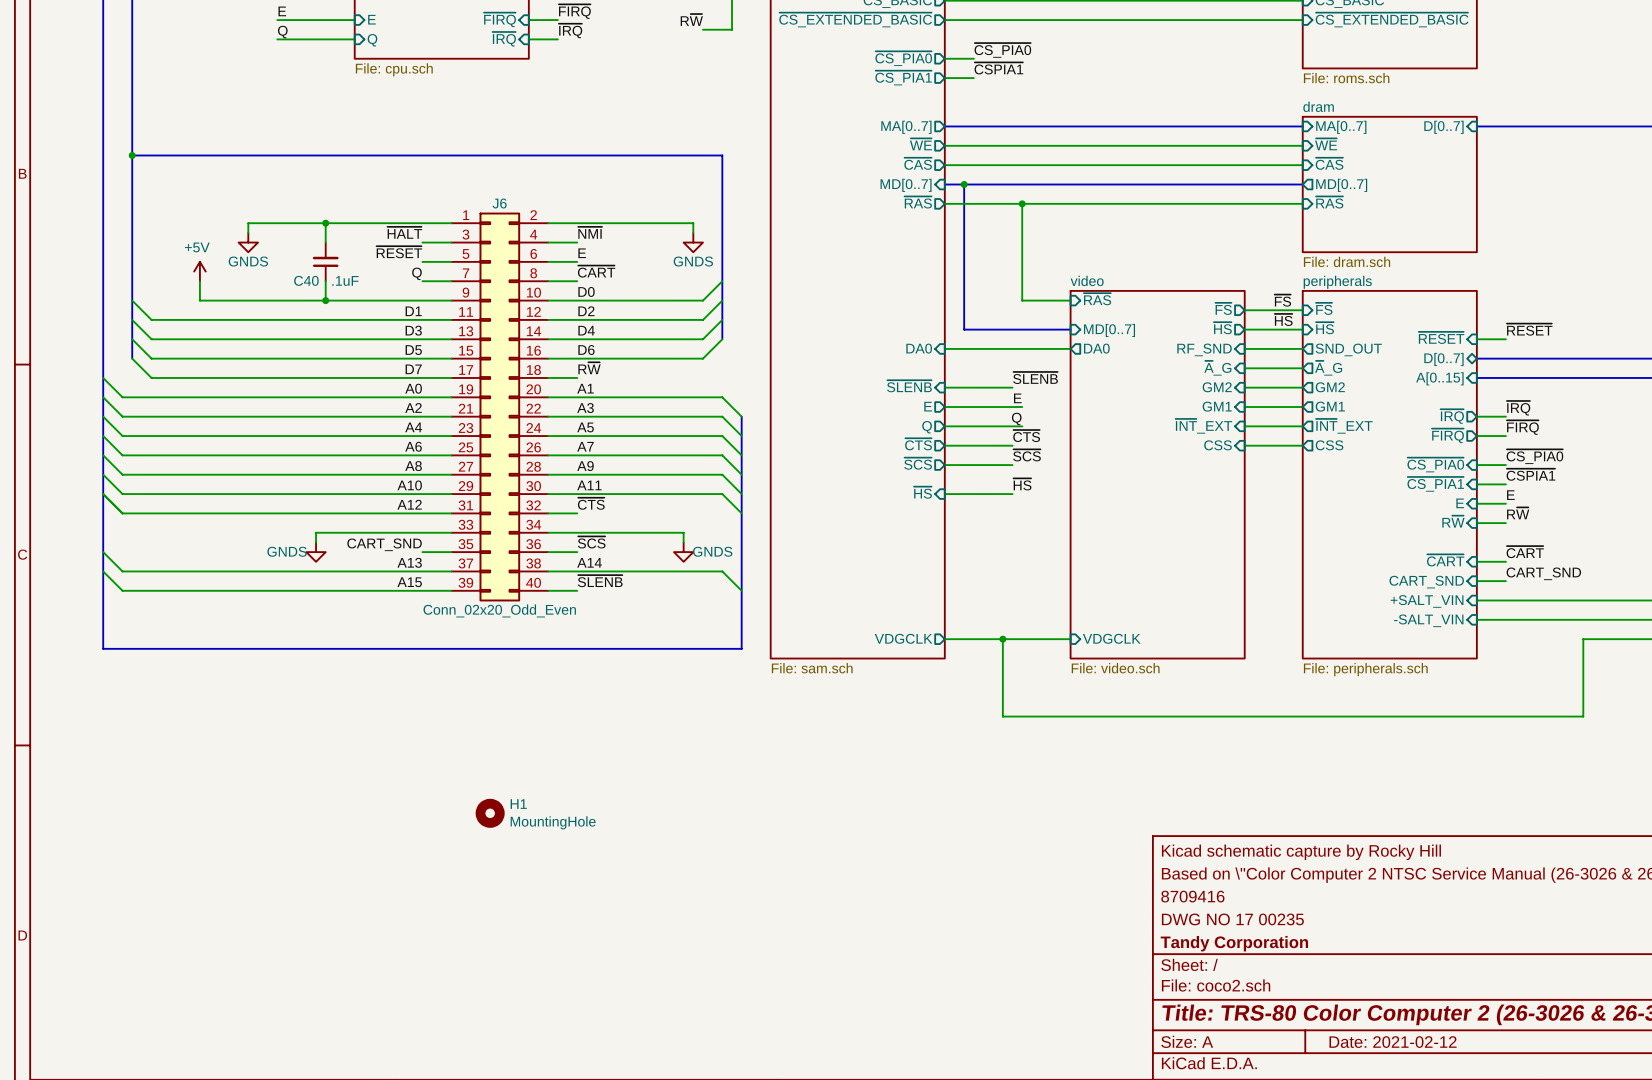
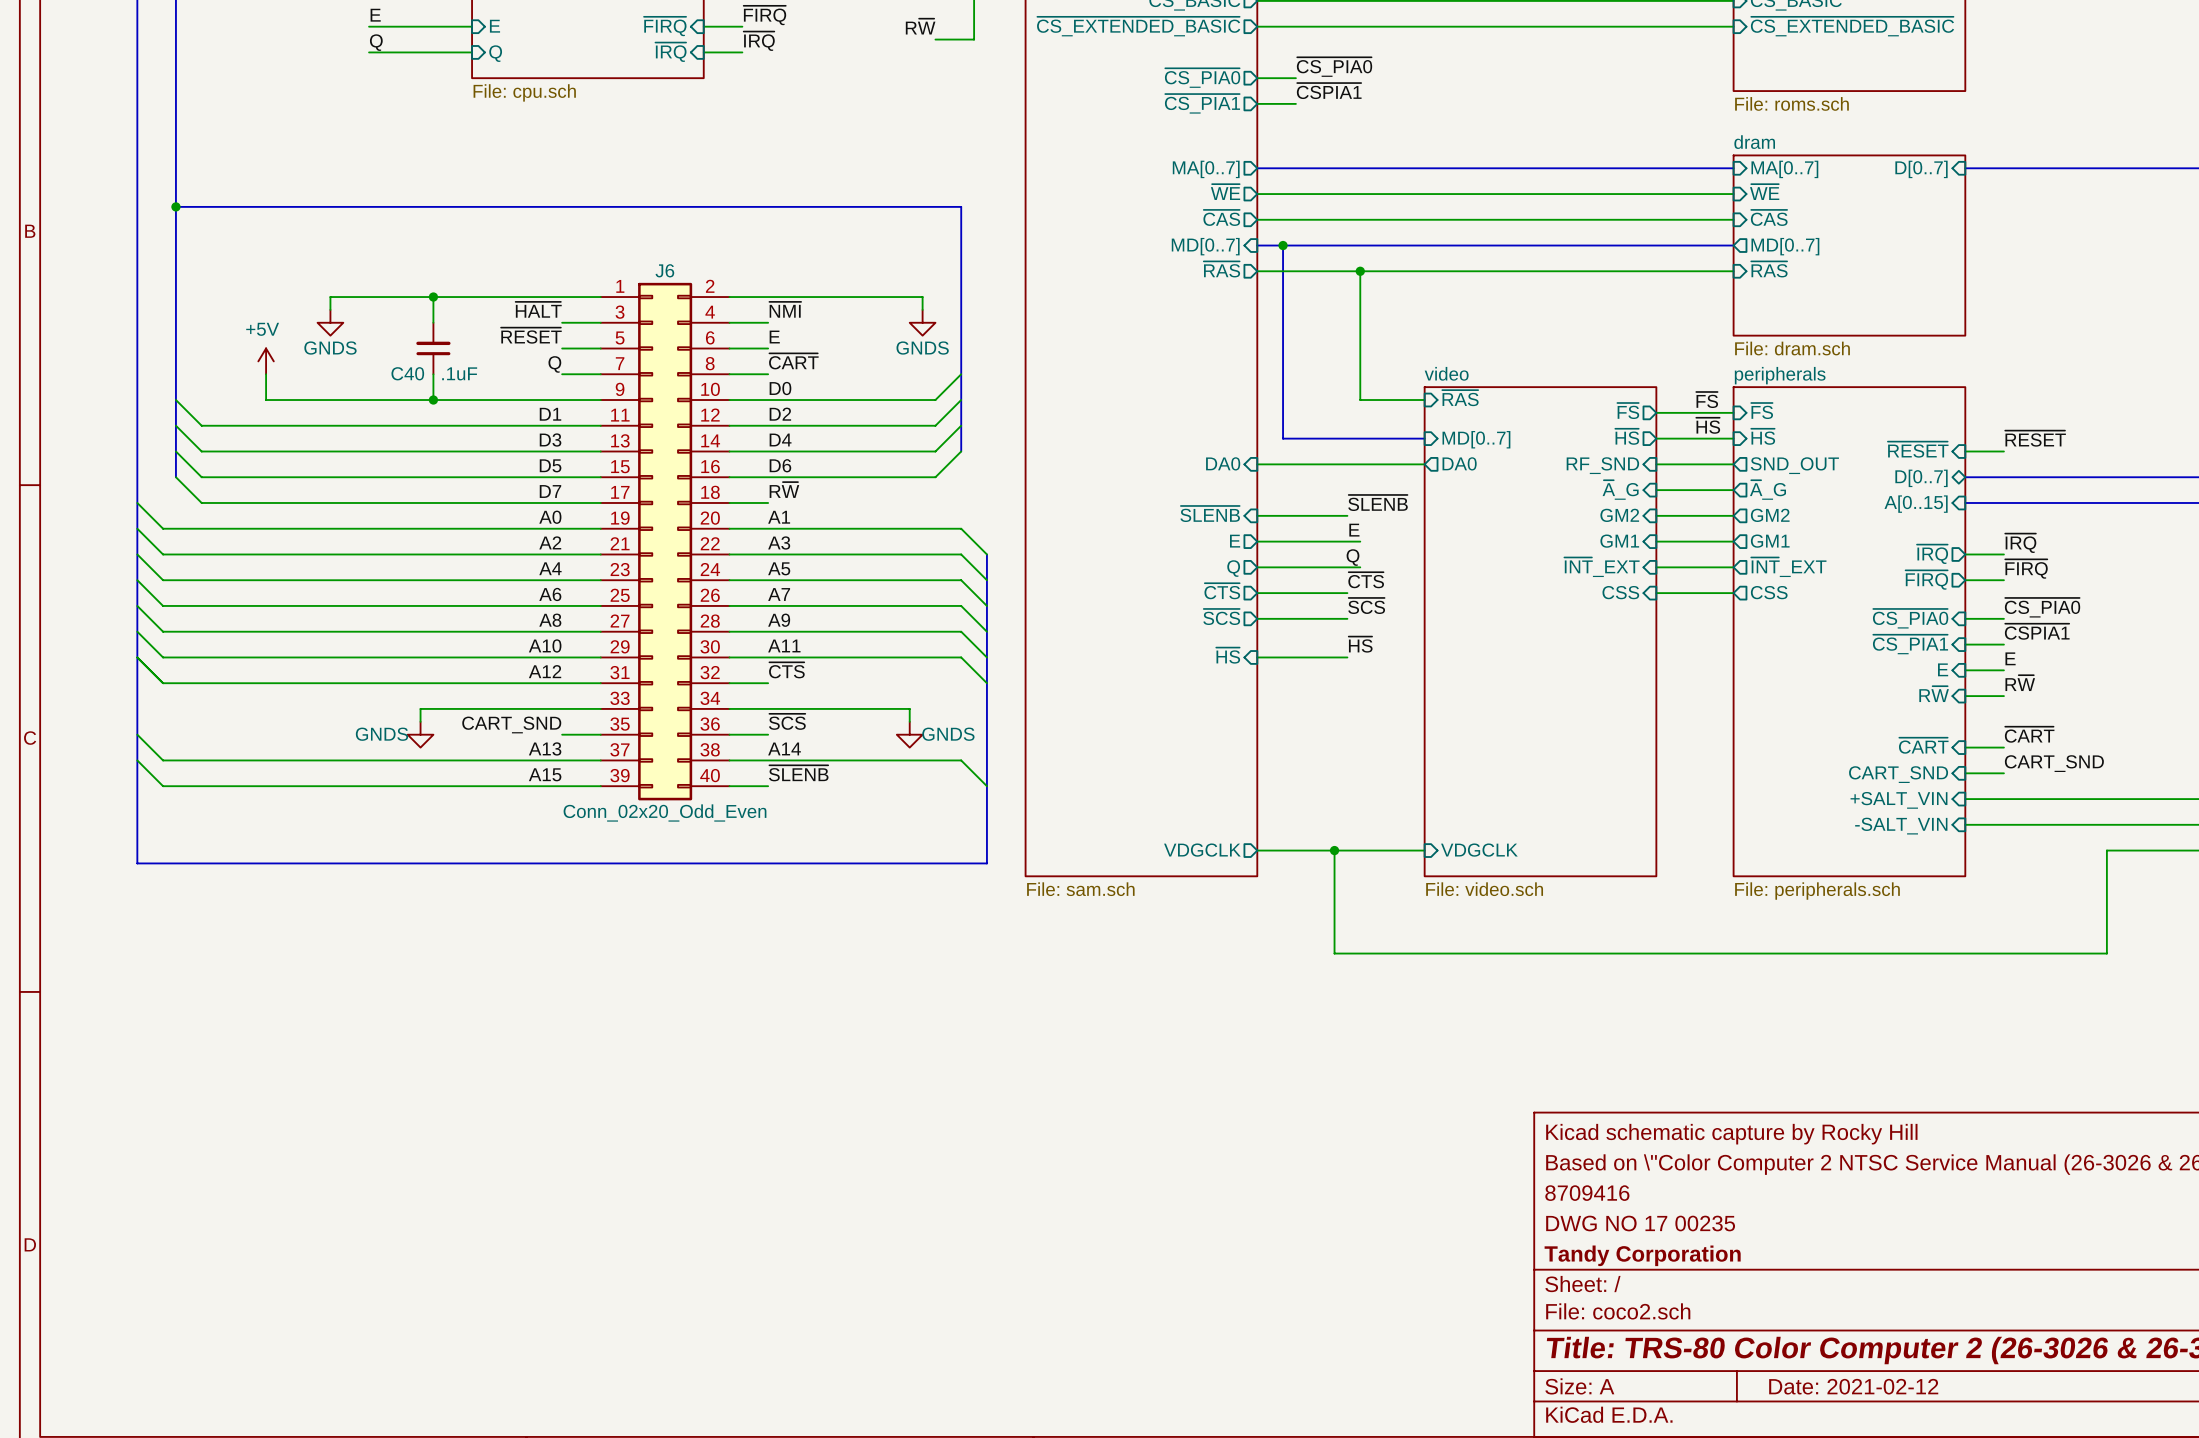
H1: MountingHole (490, 813) -> none

